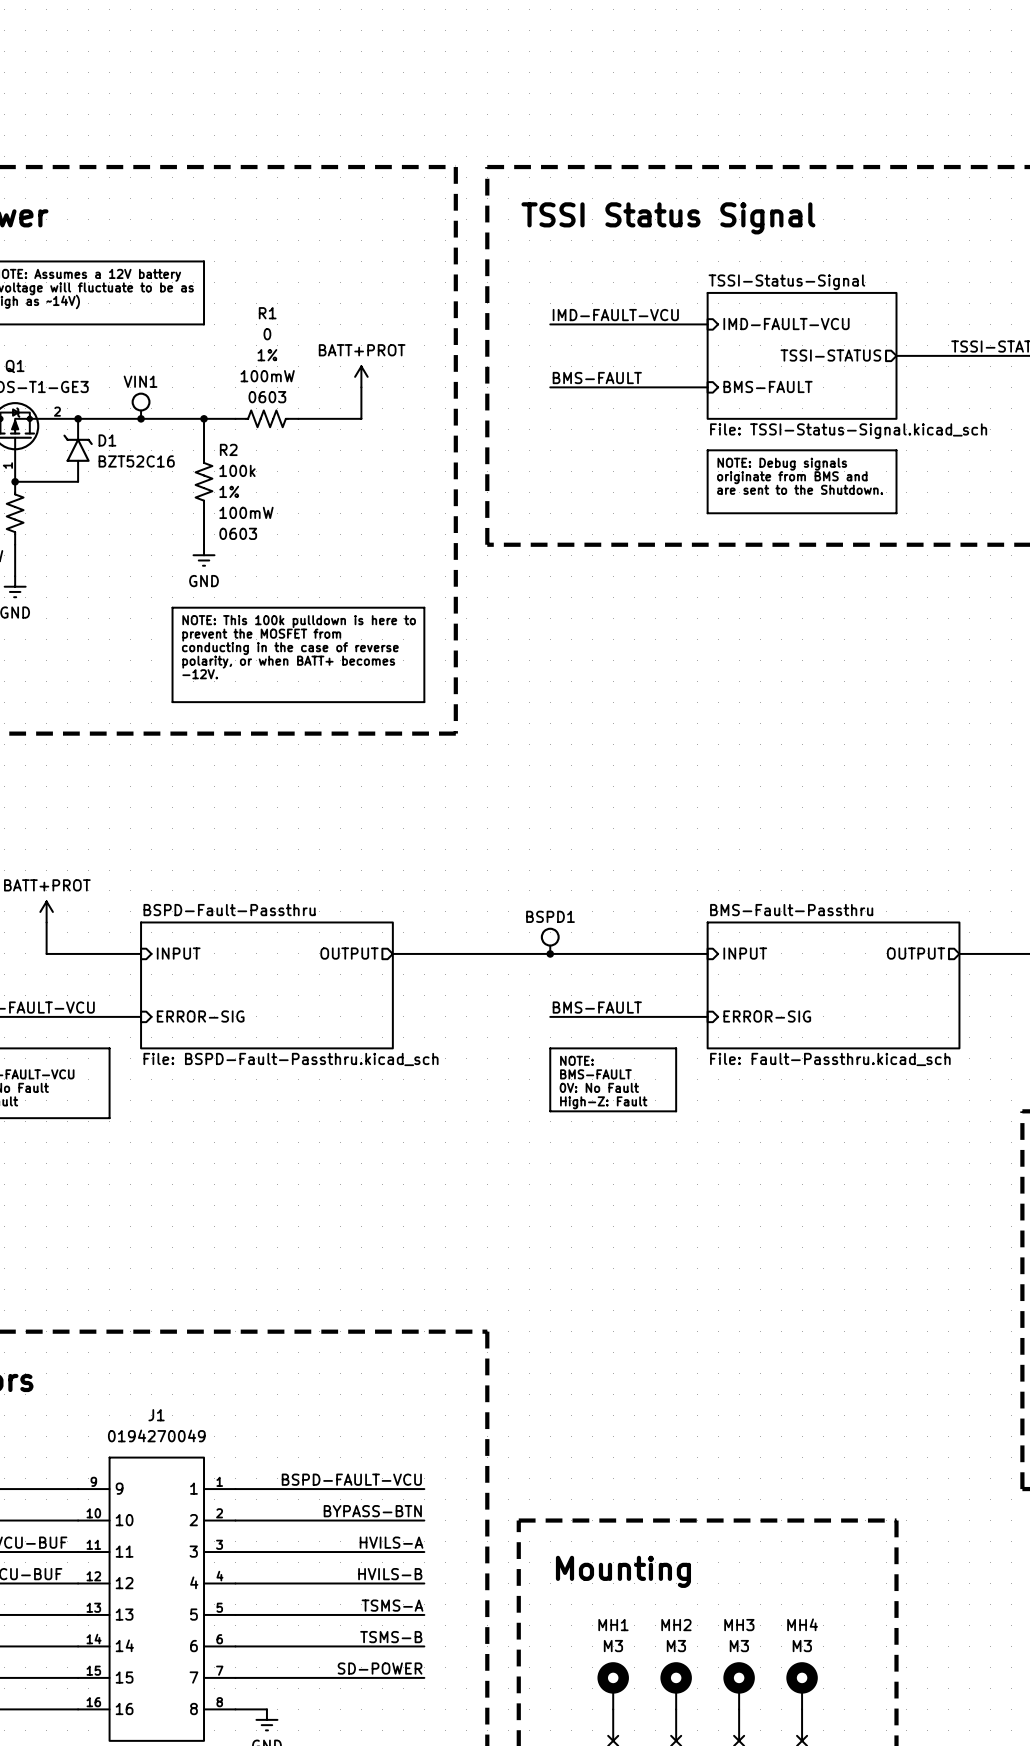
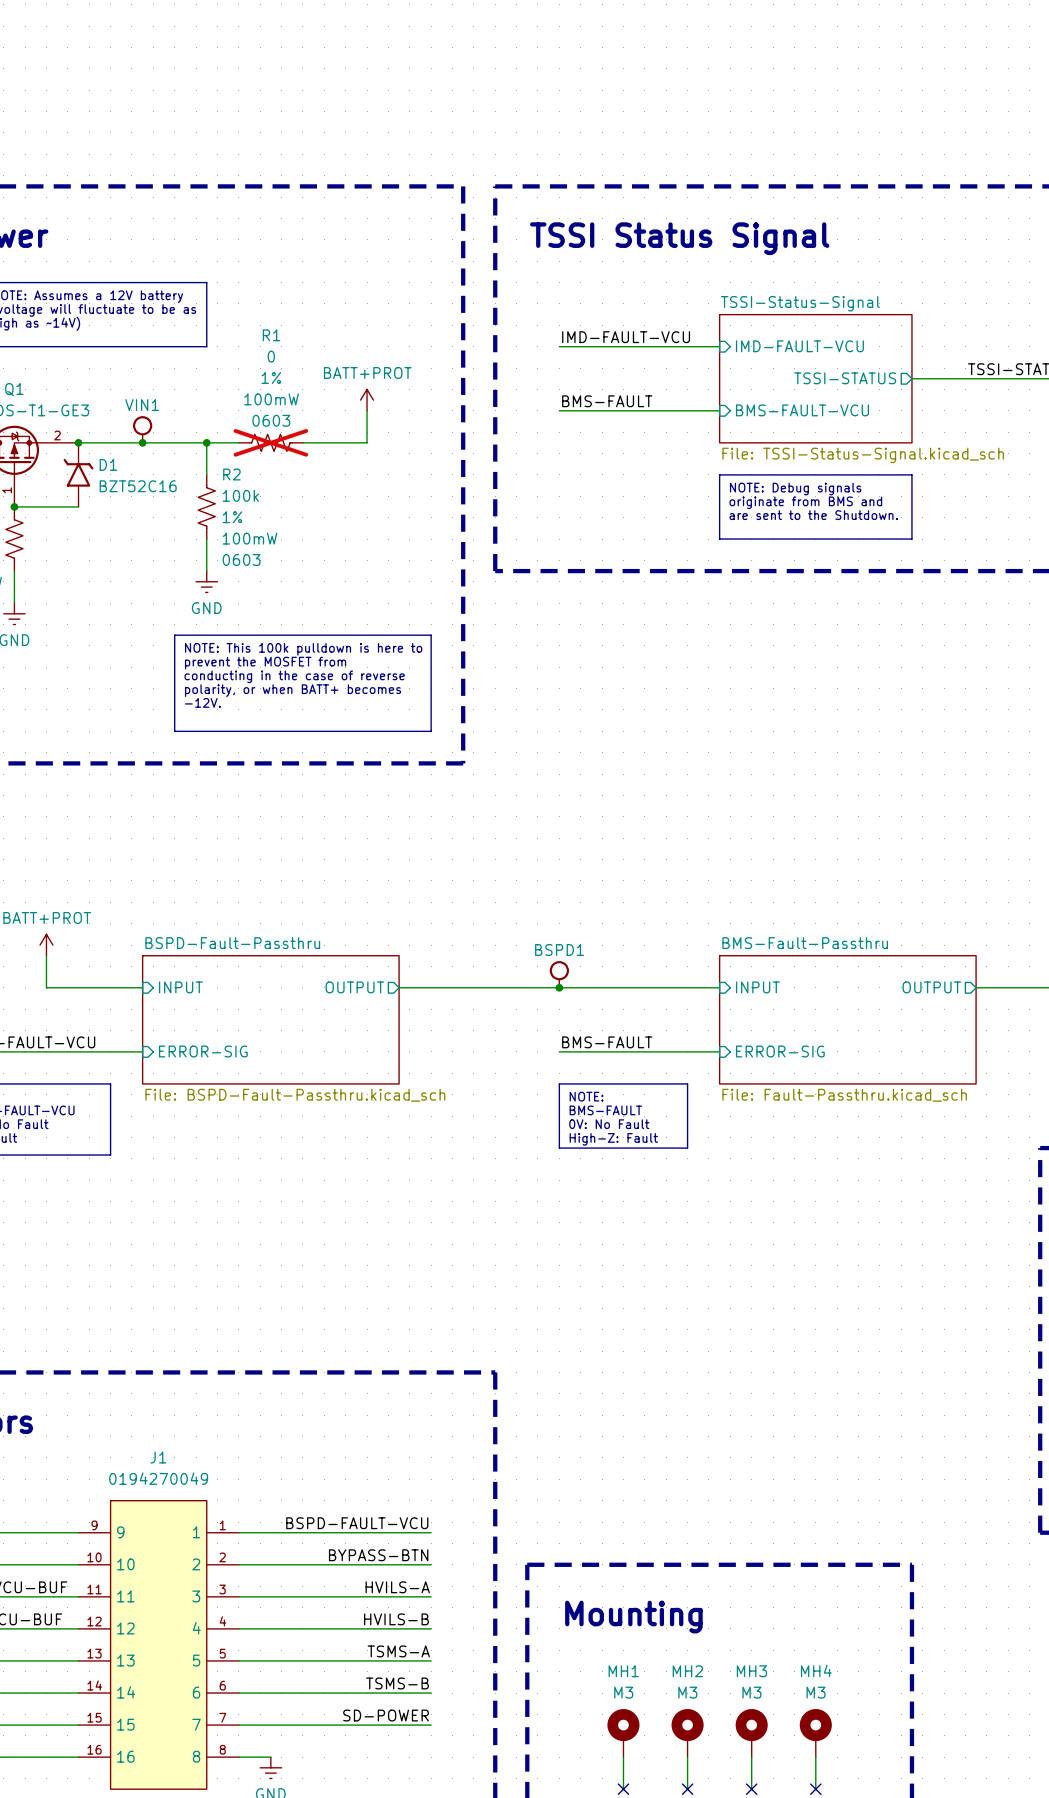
sheet pin: BMS-FAULT (768, 386) -> BMS-FAULT-VCU (802, 410)
R1 do-not-place cross: none -> (270, 442)

